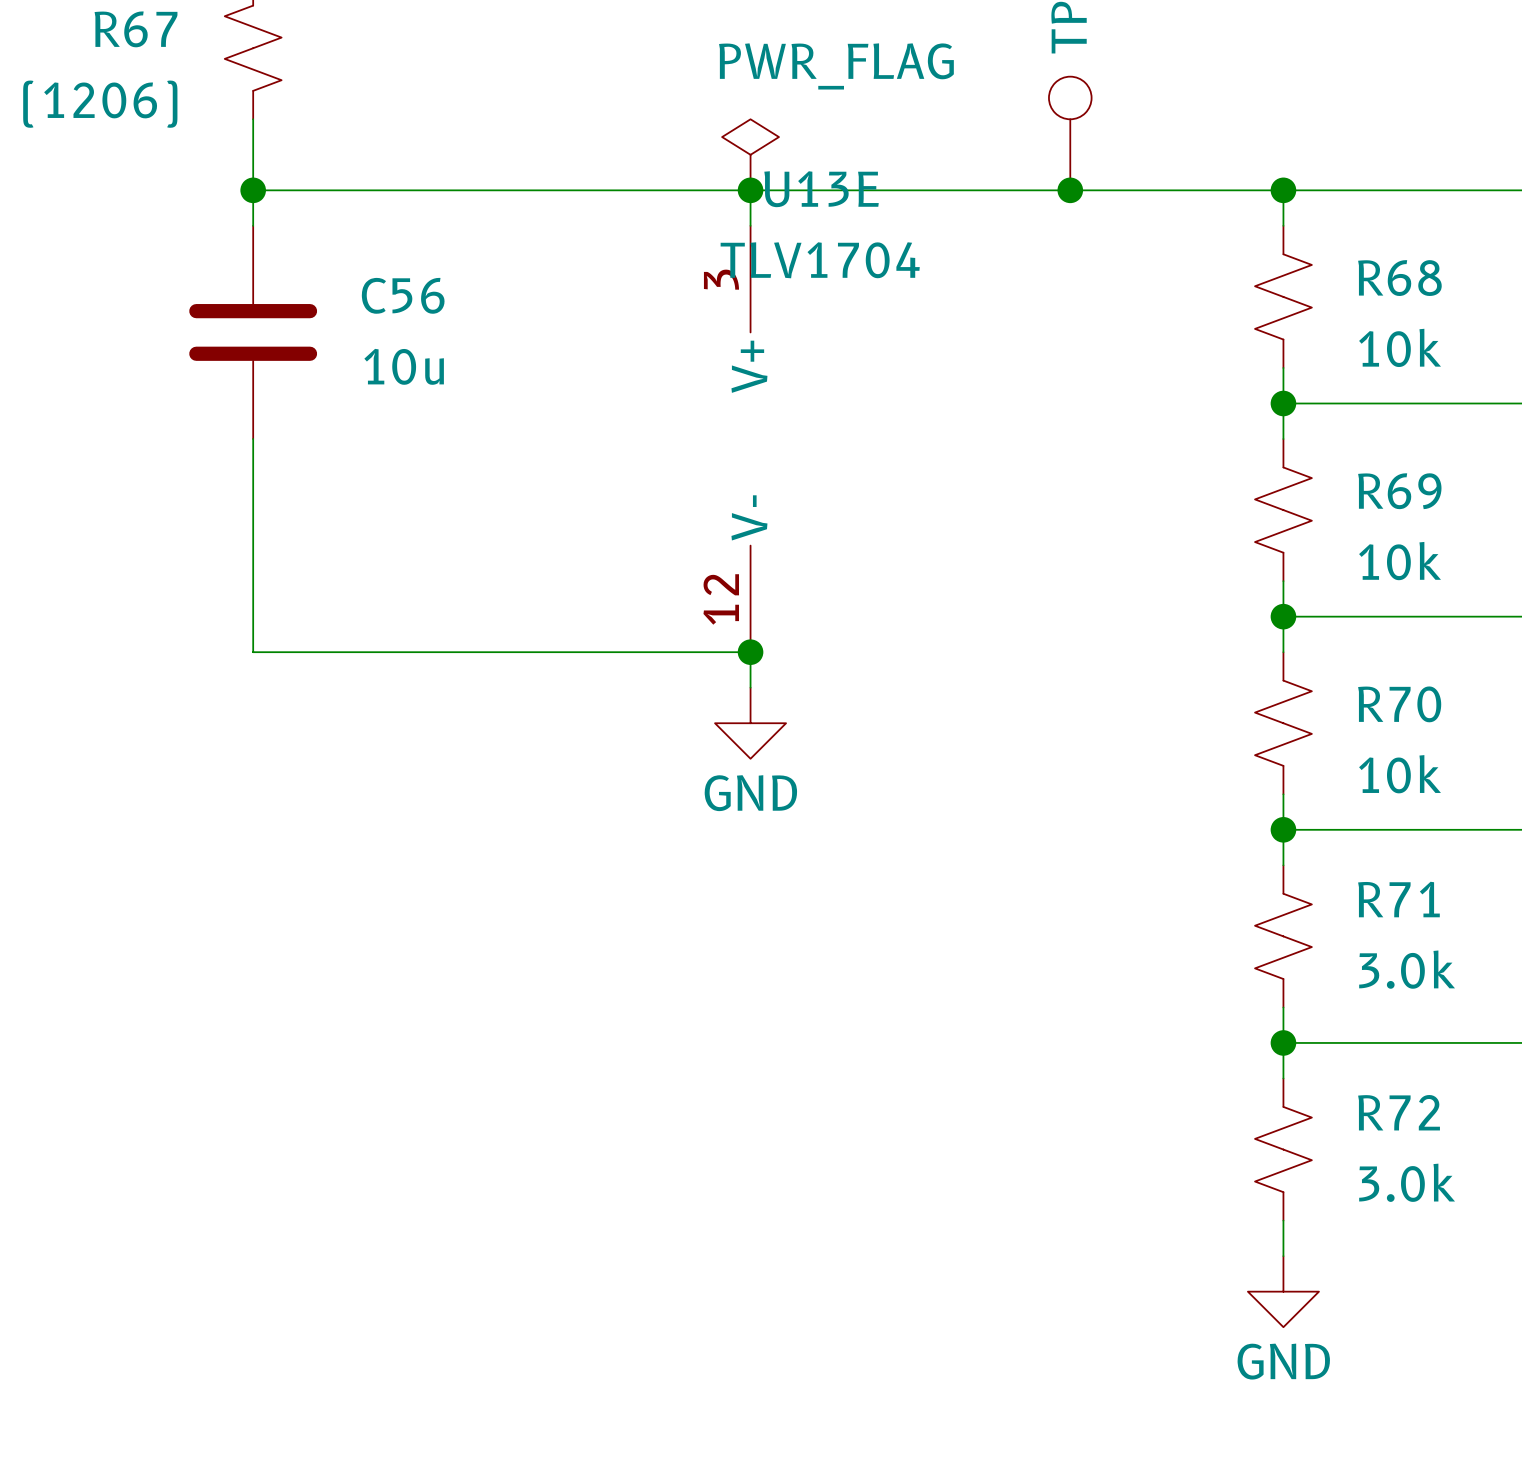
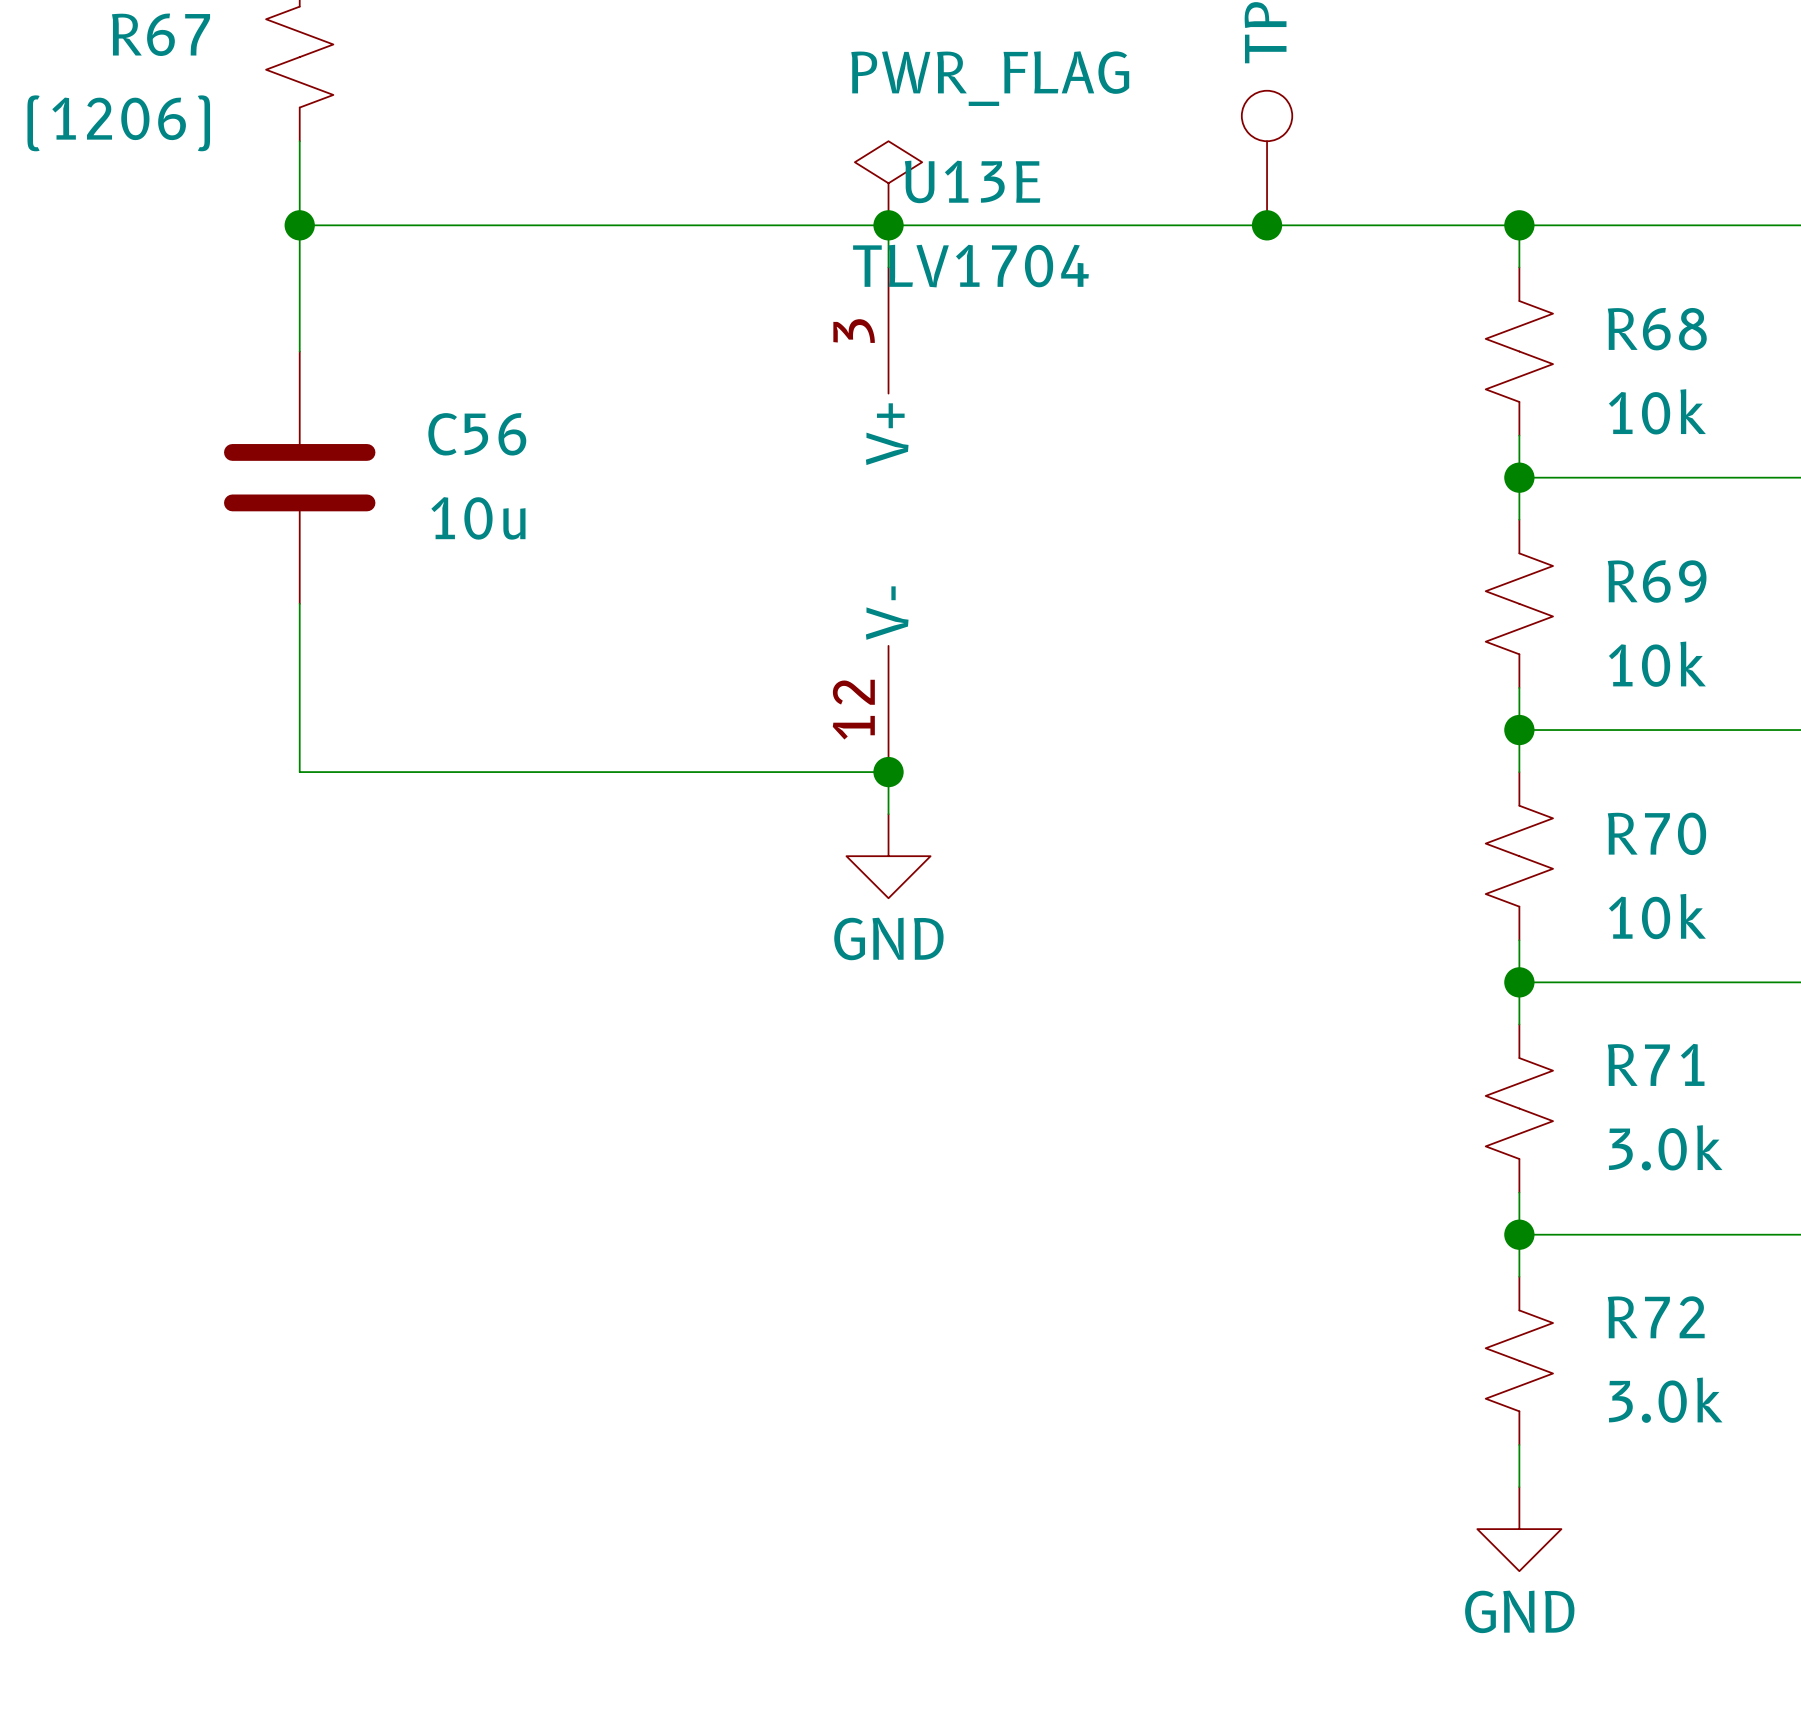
U13E name position: U13E (821, 189) -> U13E (972, 181)
U13E value position: TLV1704 (820, 260) -> TLV1704 (970, 266)
C56 position: (253, 332) -> (299, 477)

